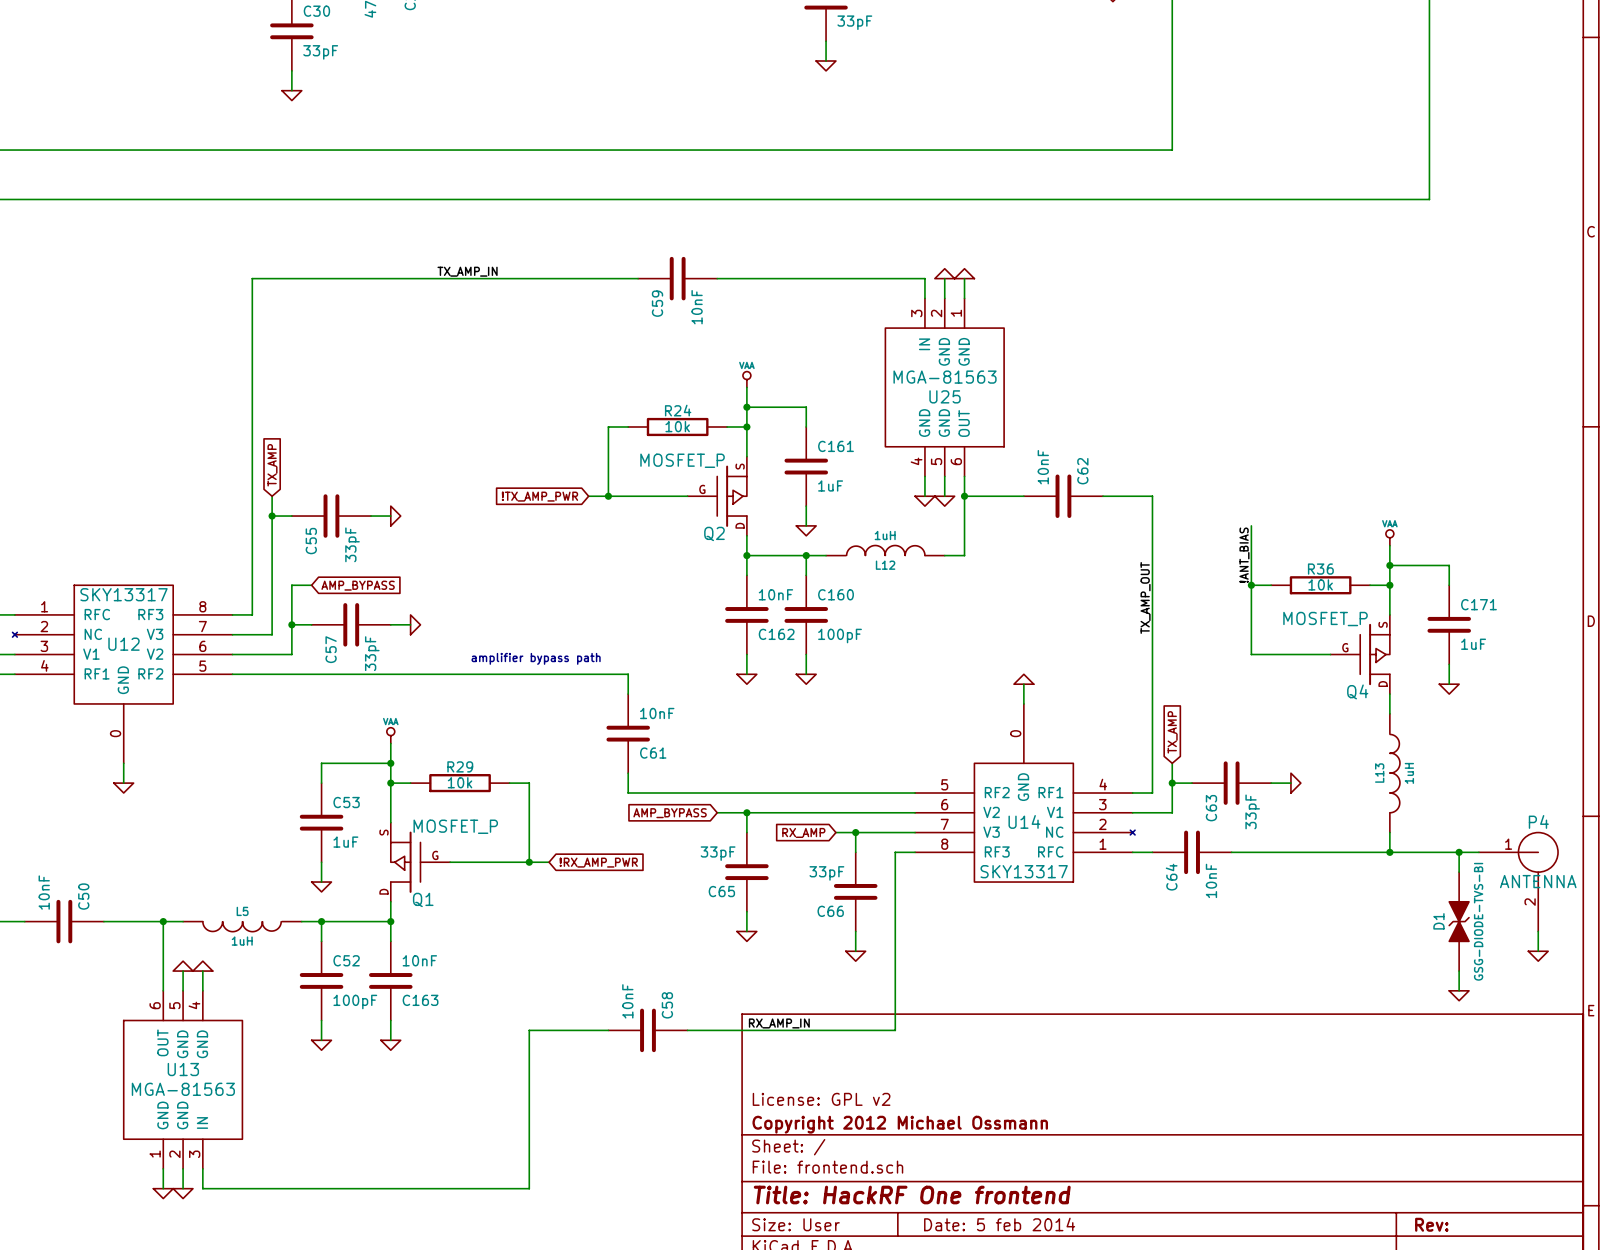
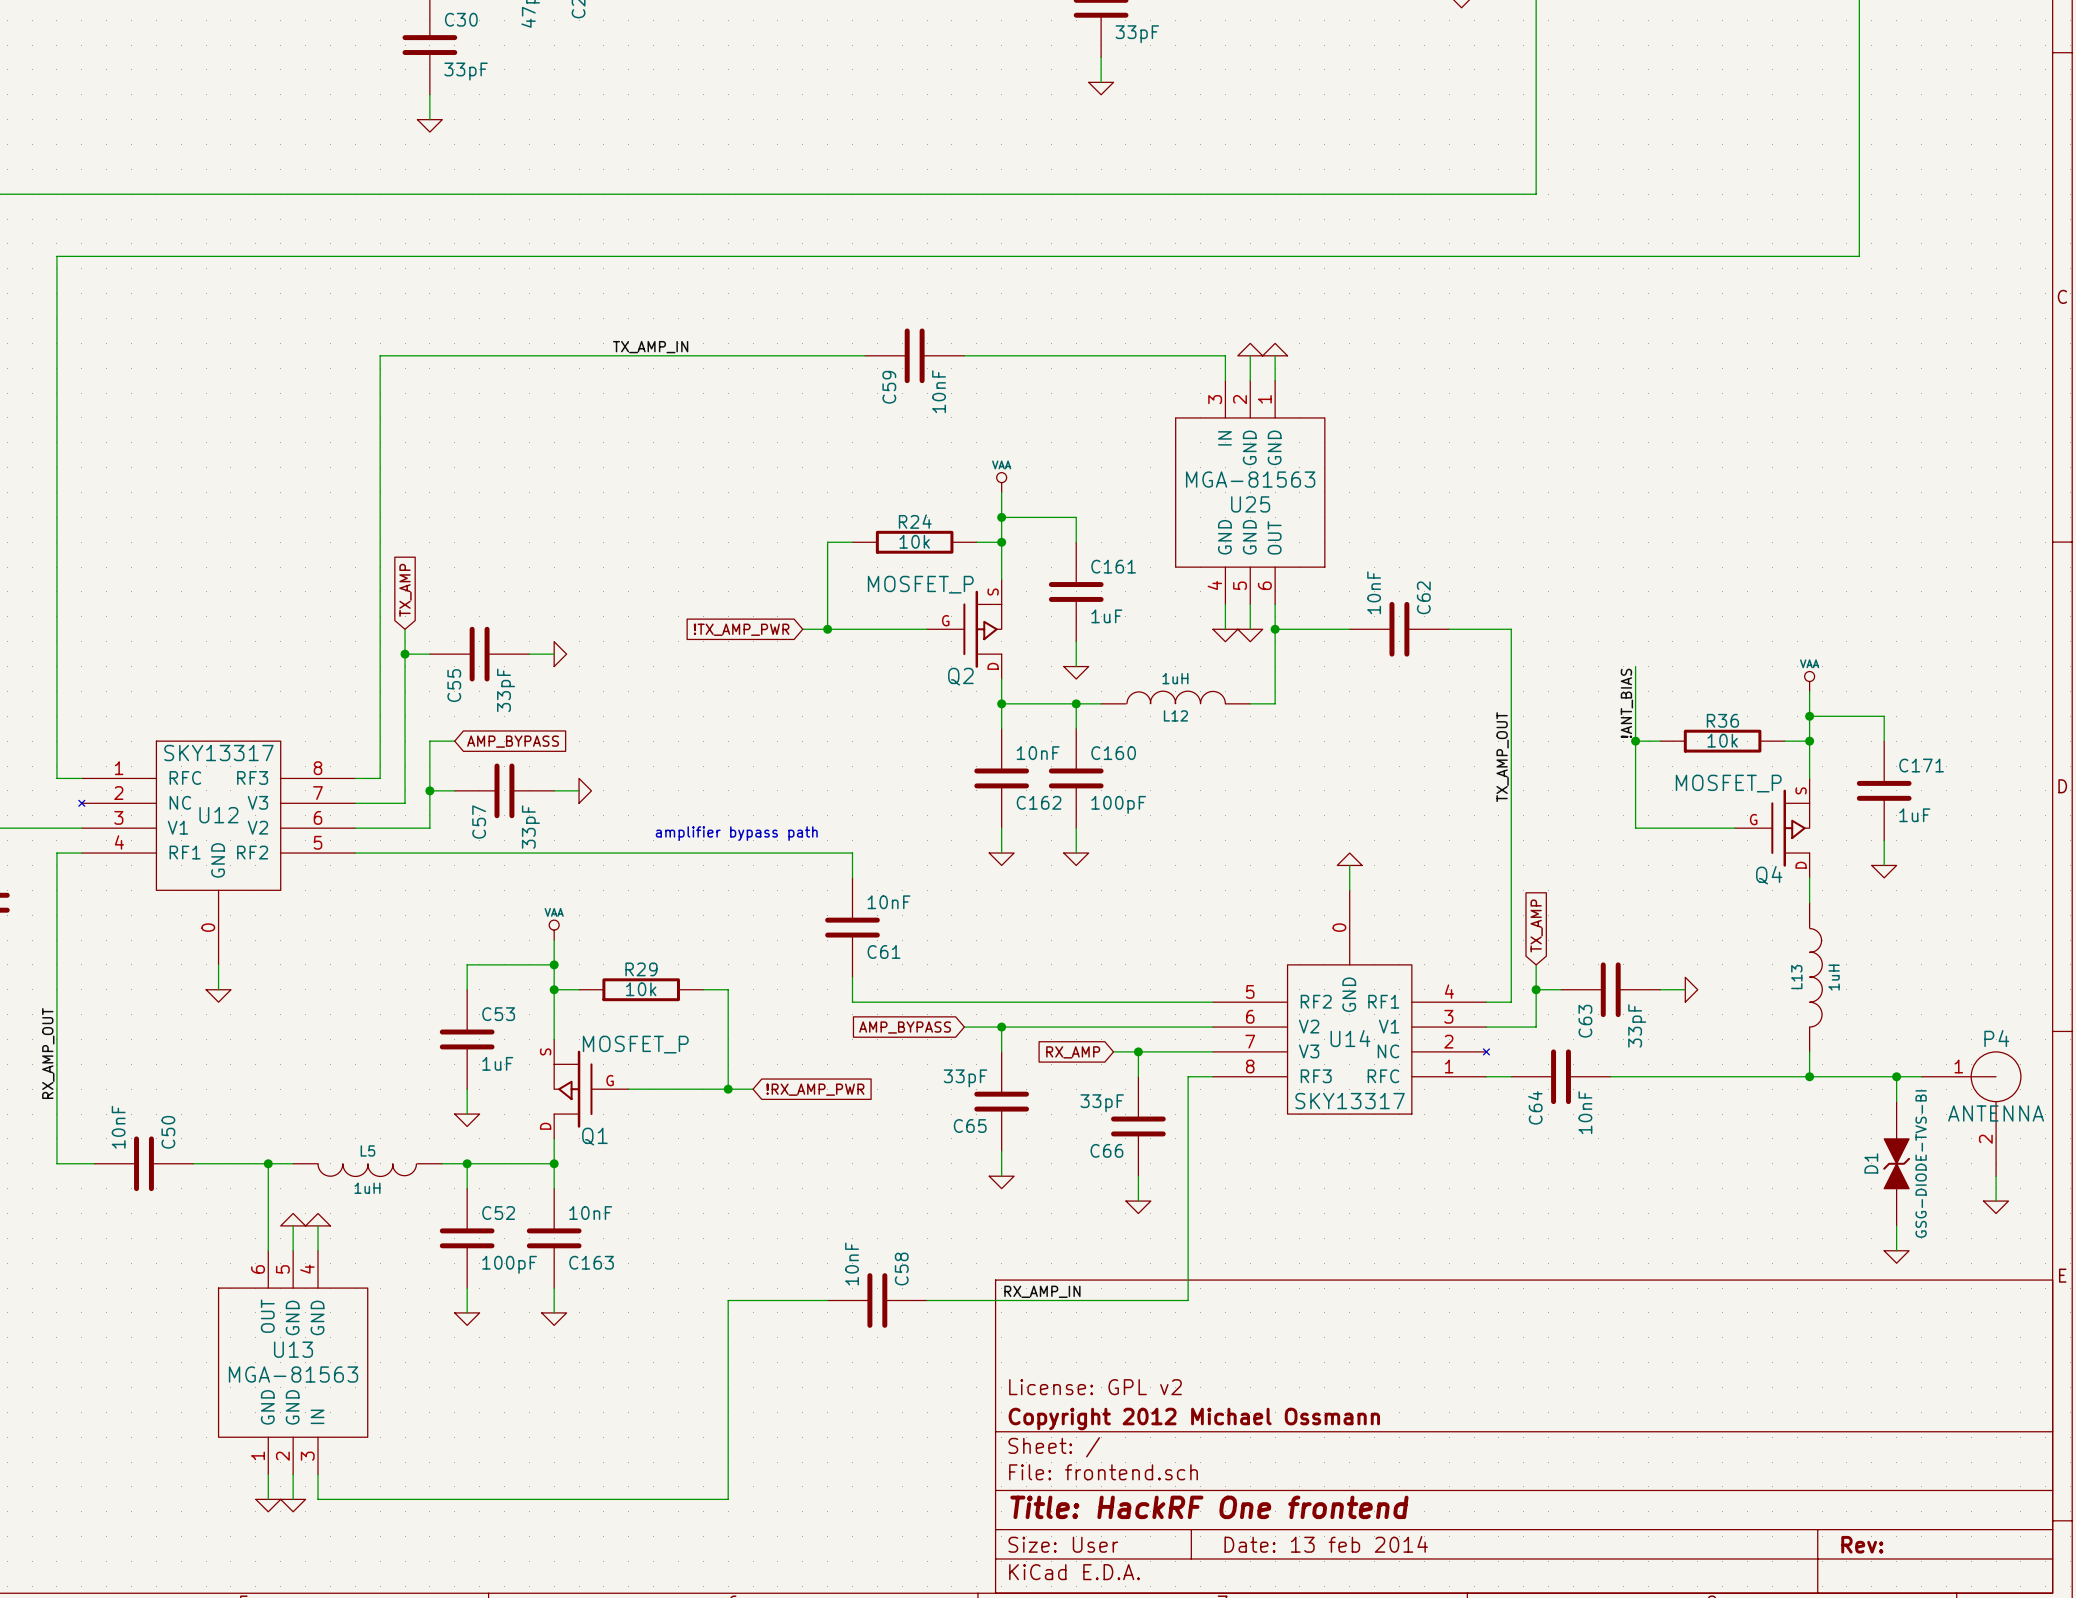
title block: Date: 5 feb 2014 (999, 1224) -> Date: 13 feb 2014 (1326, 1544)

